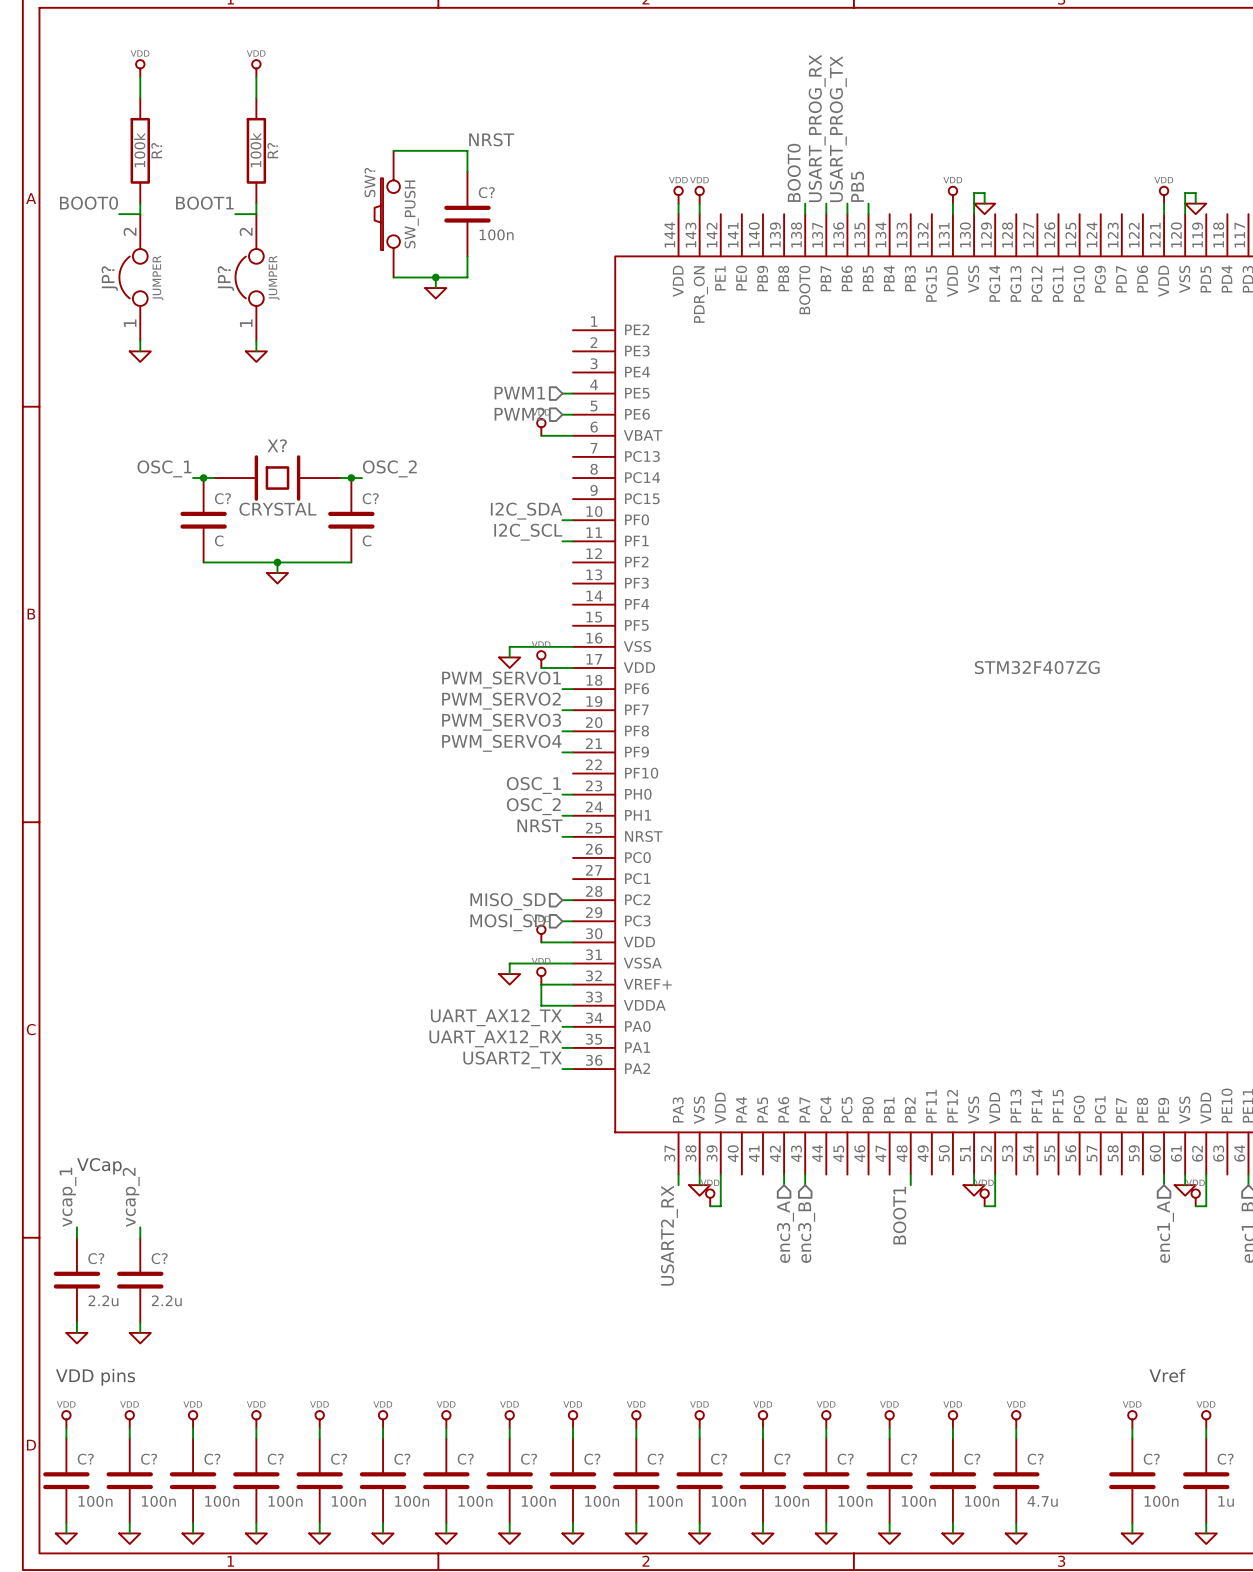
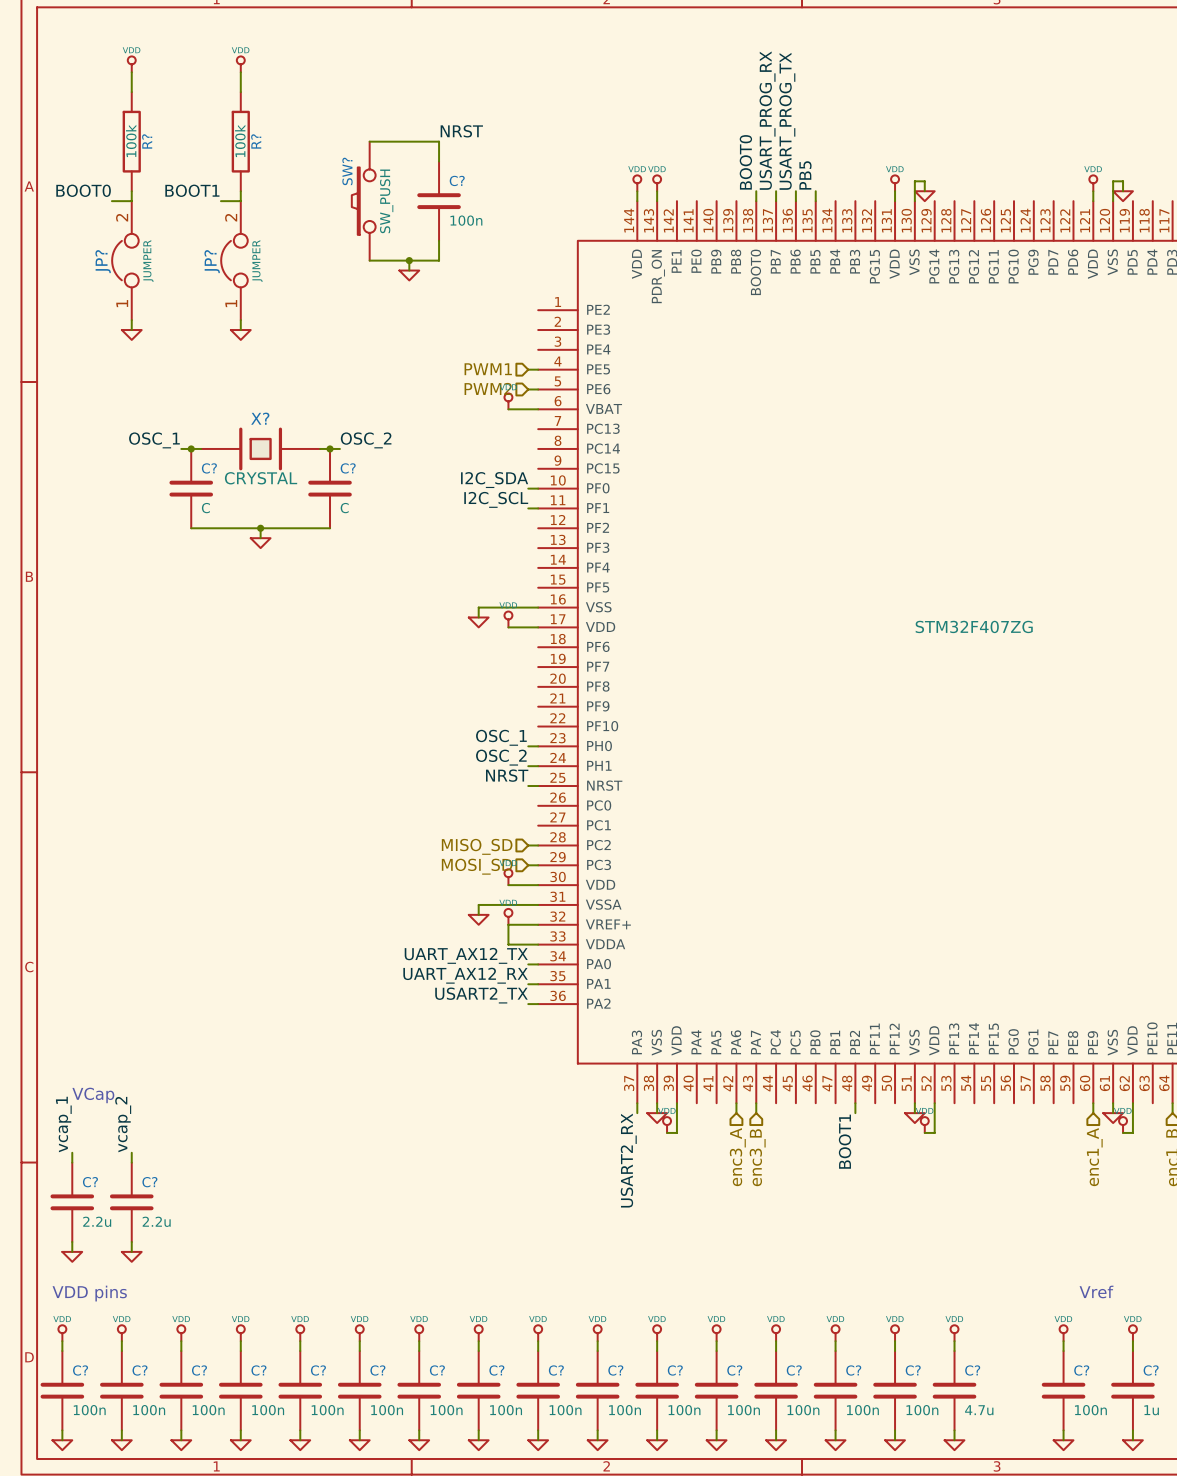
label: PWM_SERVO1 (501, 679) -> none
wire: (562, 689) (573, 689) -> none
label: PWM_SERVO2 (501, 701) -> none
wire: (562, 710) (573, 710) -> none
label: PWM_SERVO3 (501, 722) -> none
wire: (562, 731) (573, 731) -> none
label: PWM_SERVO4 (501, 743) -> none
wire: (562, 752) (573, 752) -> none

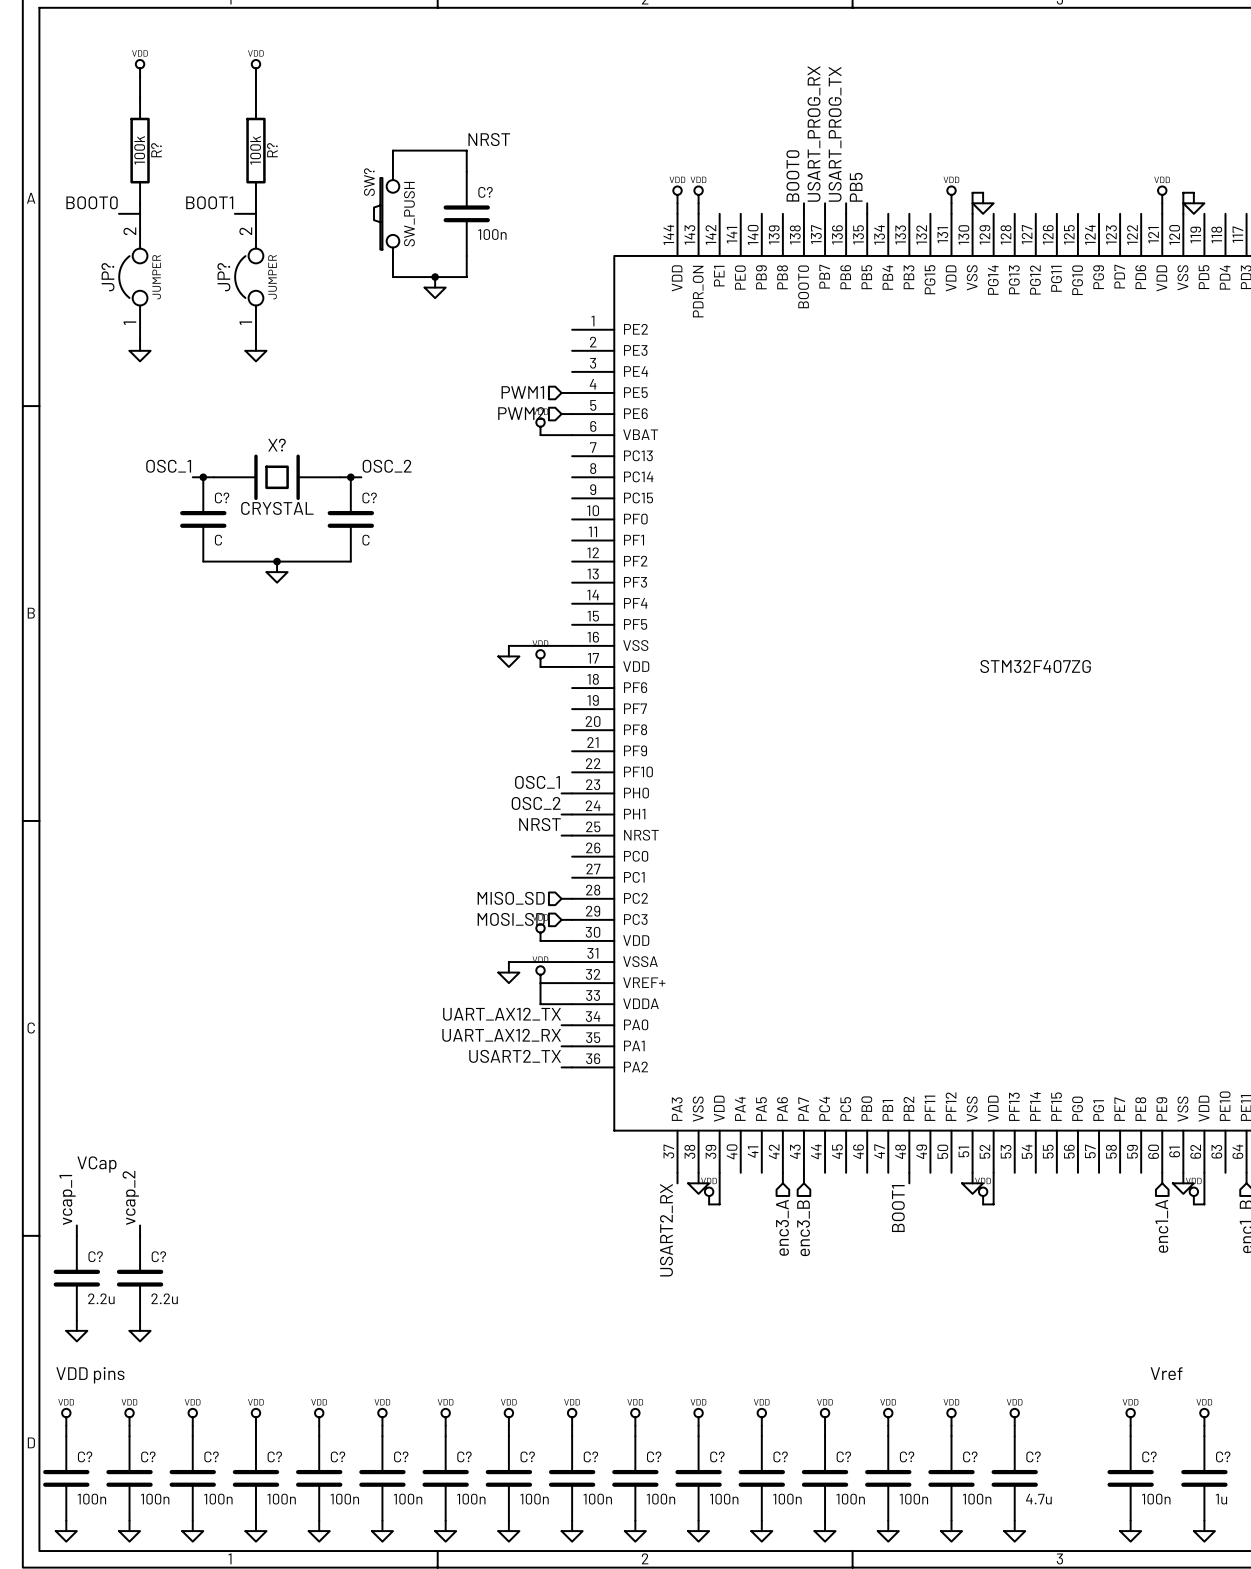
label: I2C_SDA (494, 480) -> none
wire: (528, 488) (538, 488) -> none
label: I2C_SCL (496, 499) -> none
wire: (528, 508) (538, 508) -> none

